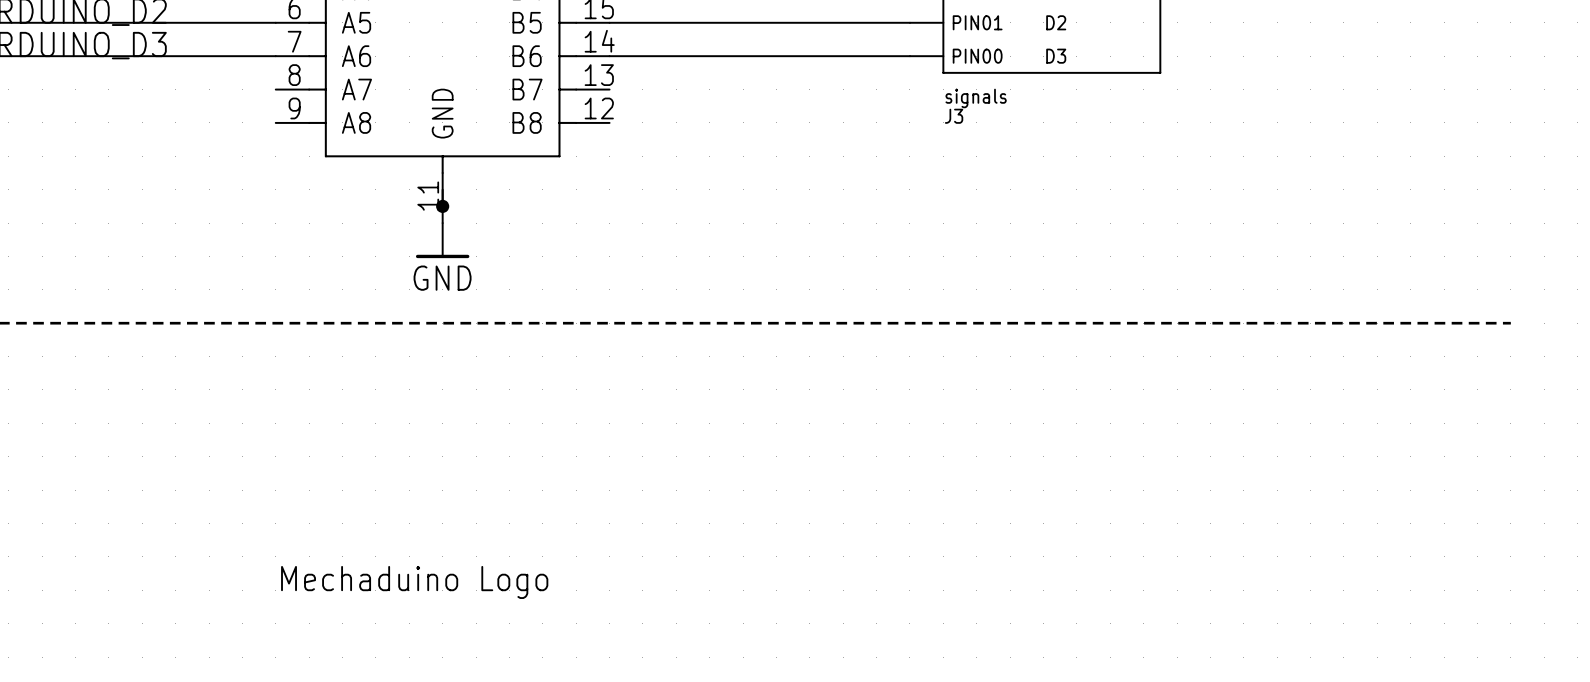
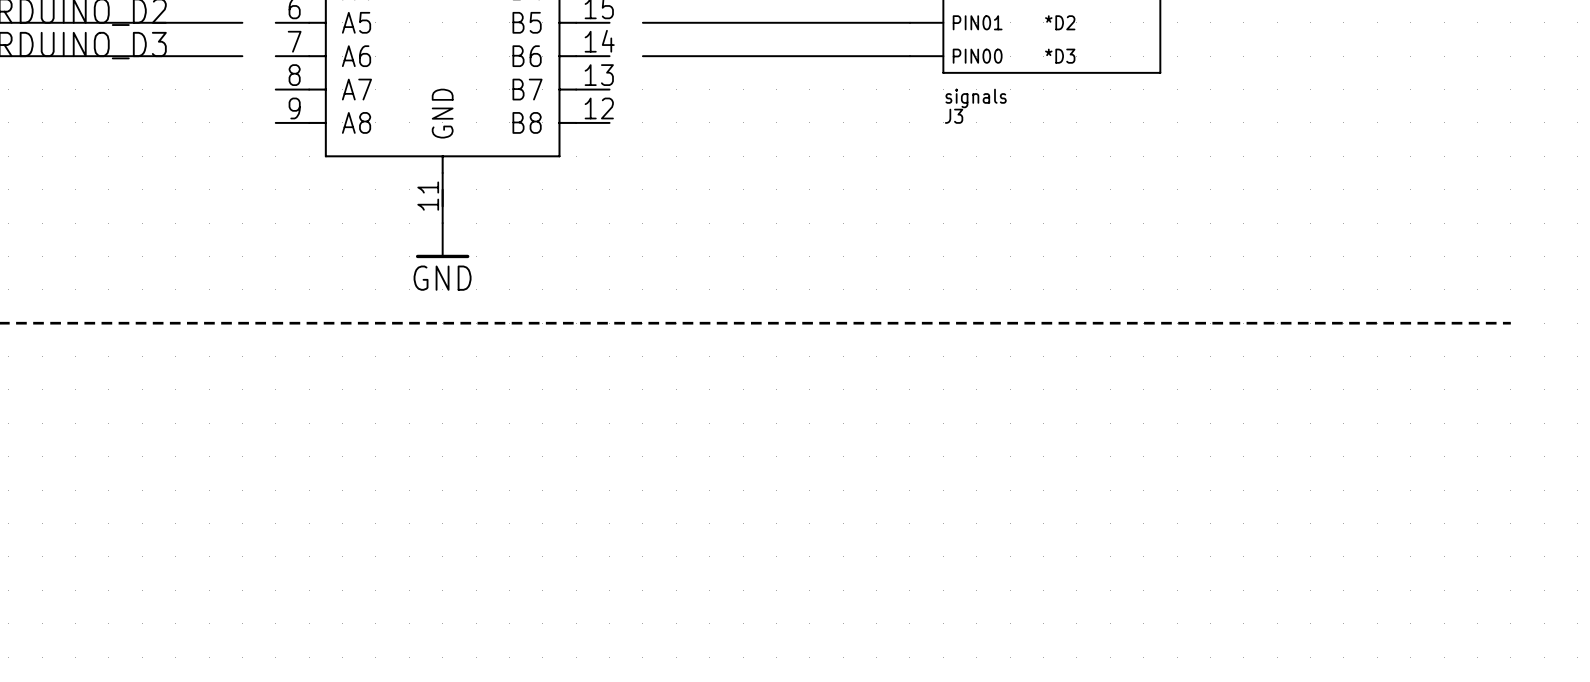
wire: (242, 22) (275, 22) -> none
wire: (609, 22) (642, 22) -> none
J3 text: D2 (1056, 22) -> *D2 (1060, 22)
wire: (242, 56) (275, 56) -> none
wire: (609, 56) (642, 56) -> none
J3 text: D3 (1056, 56) -> *D3 (1060, 56)
junction: (442, 206) -> none
part: (414, 582) -> none

